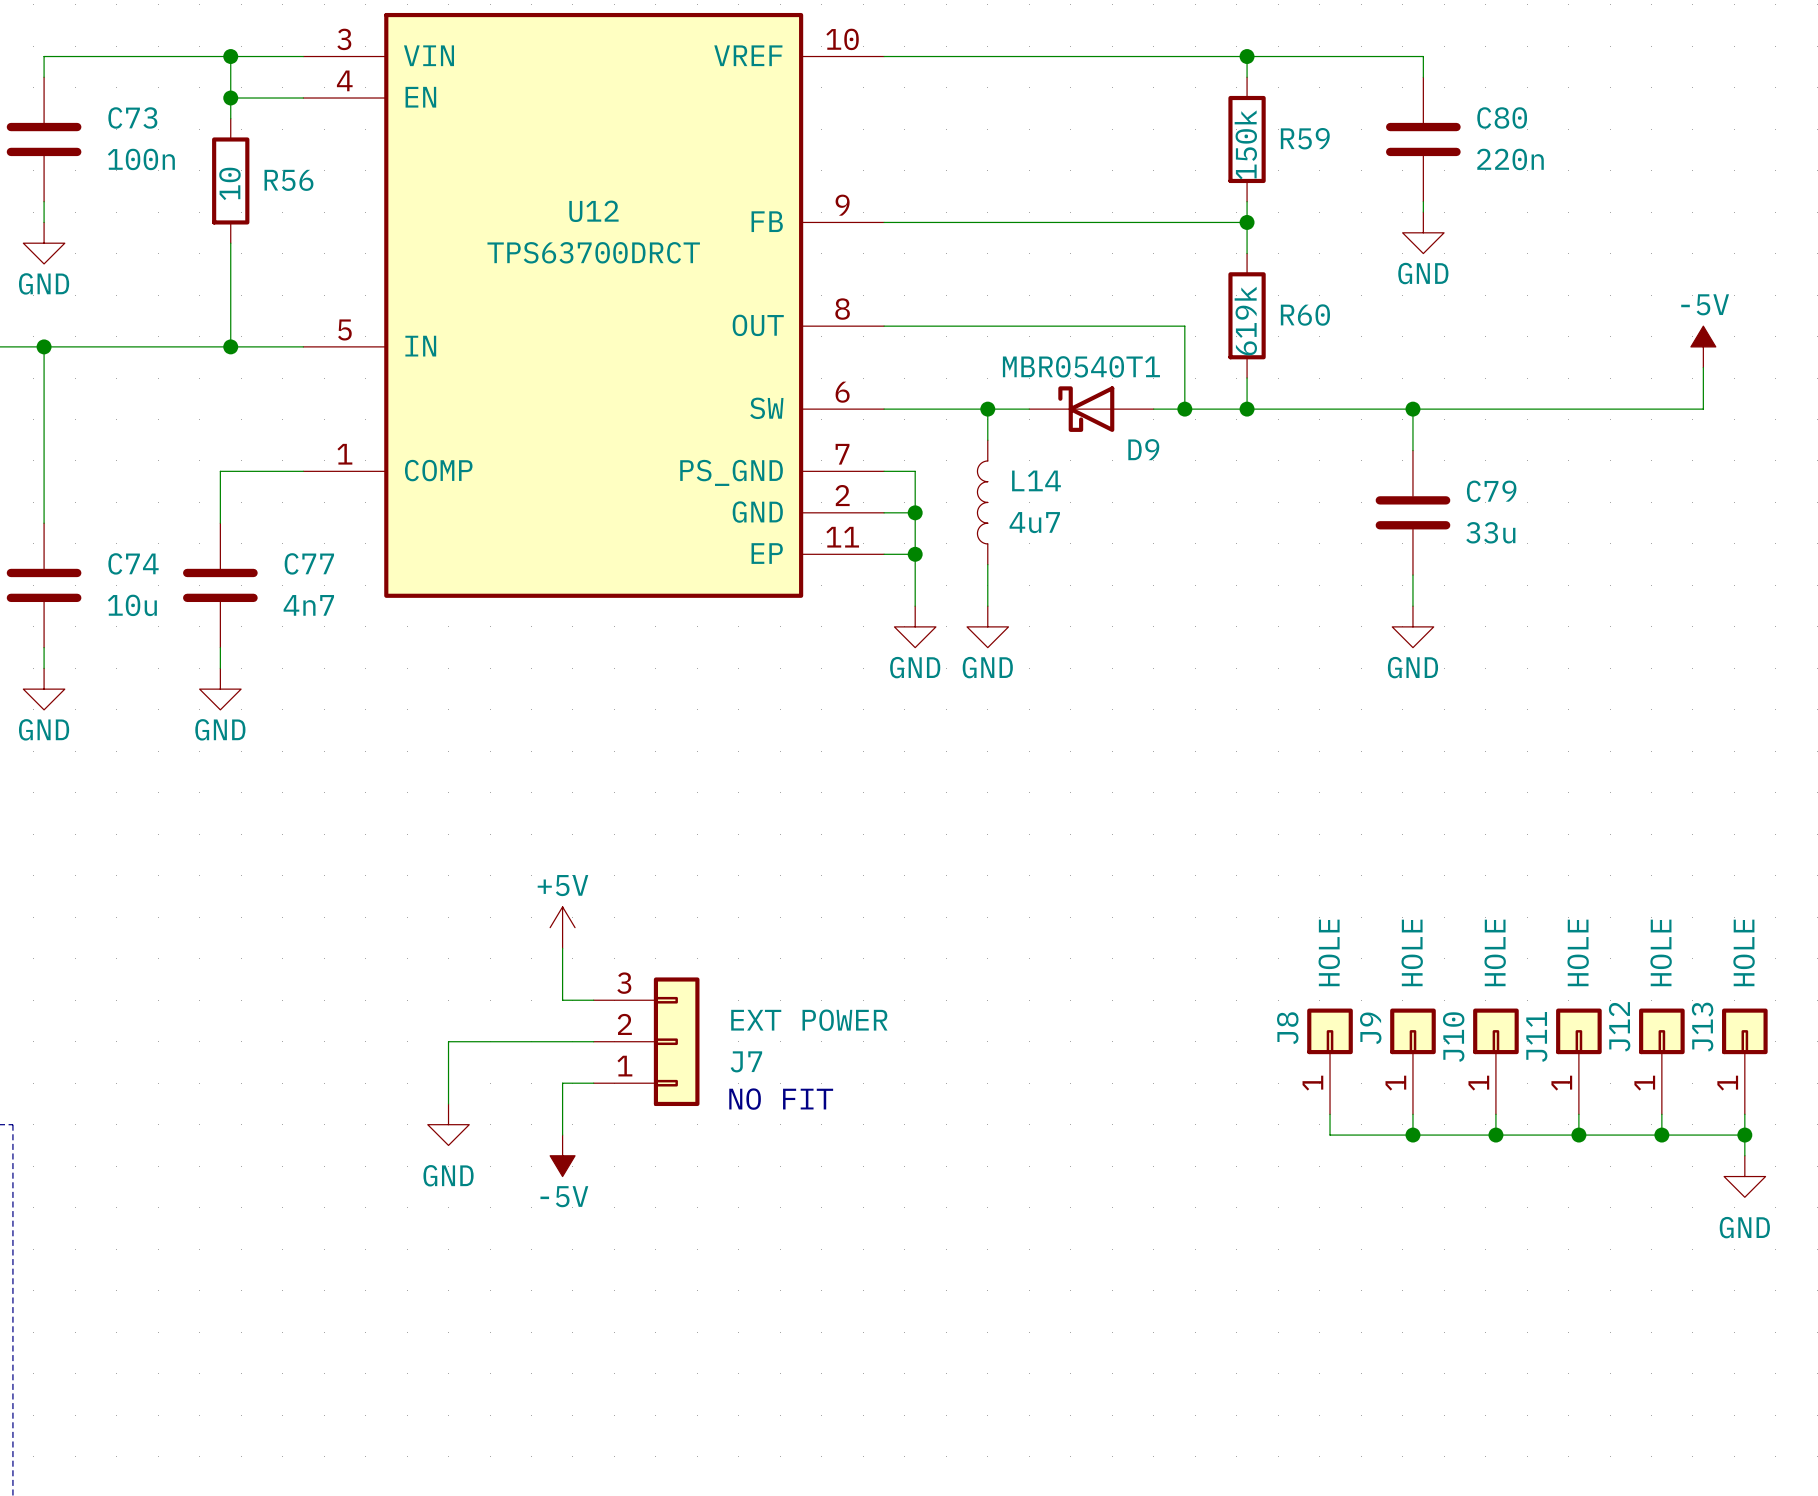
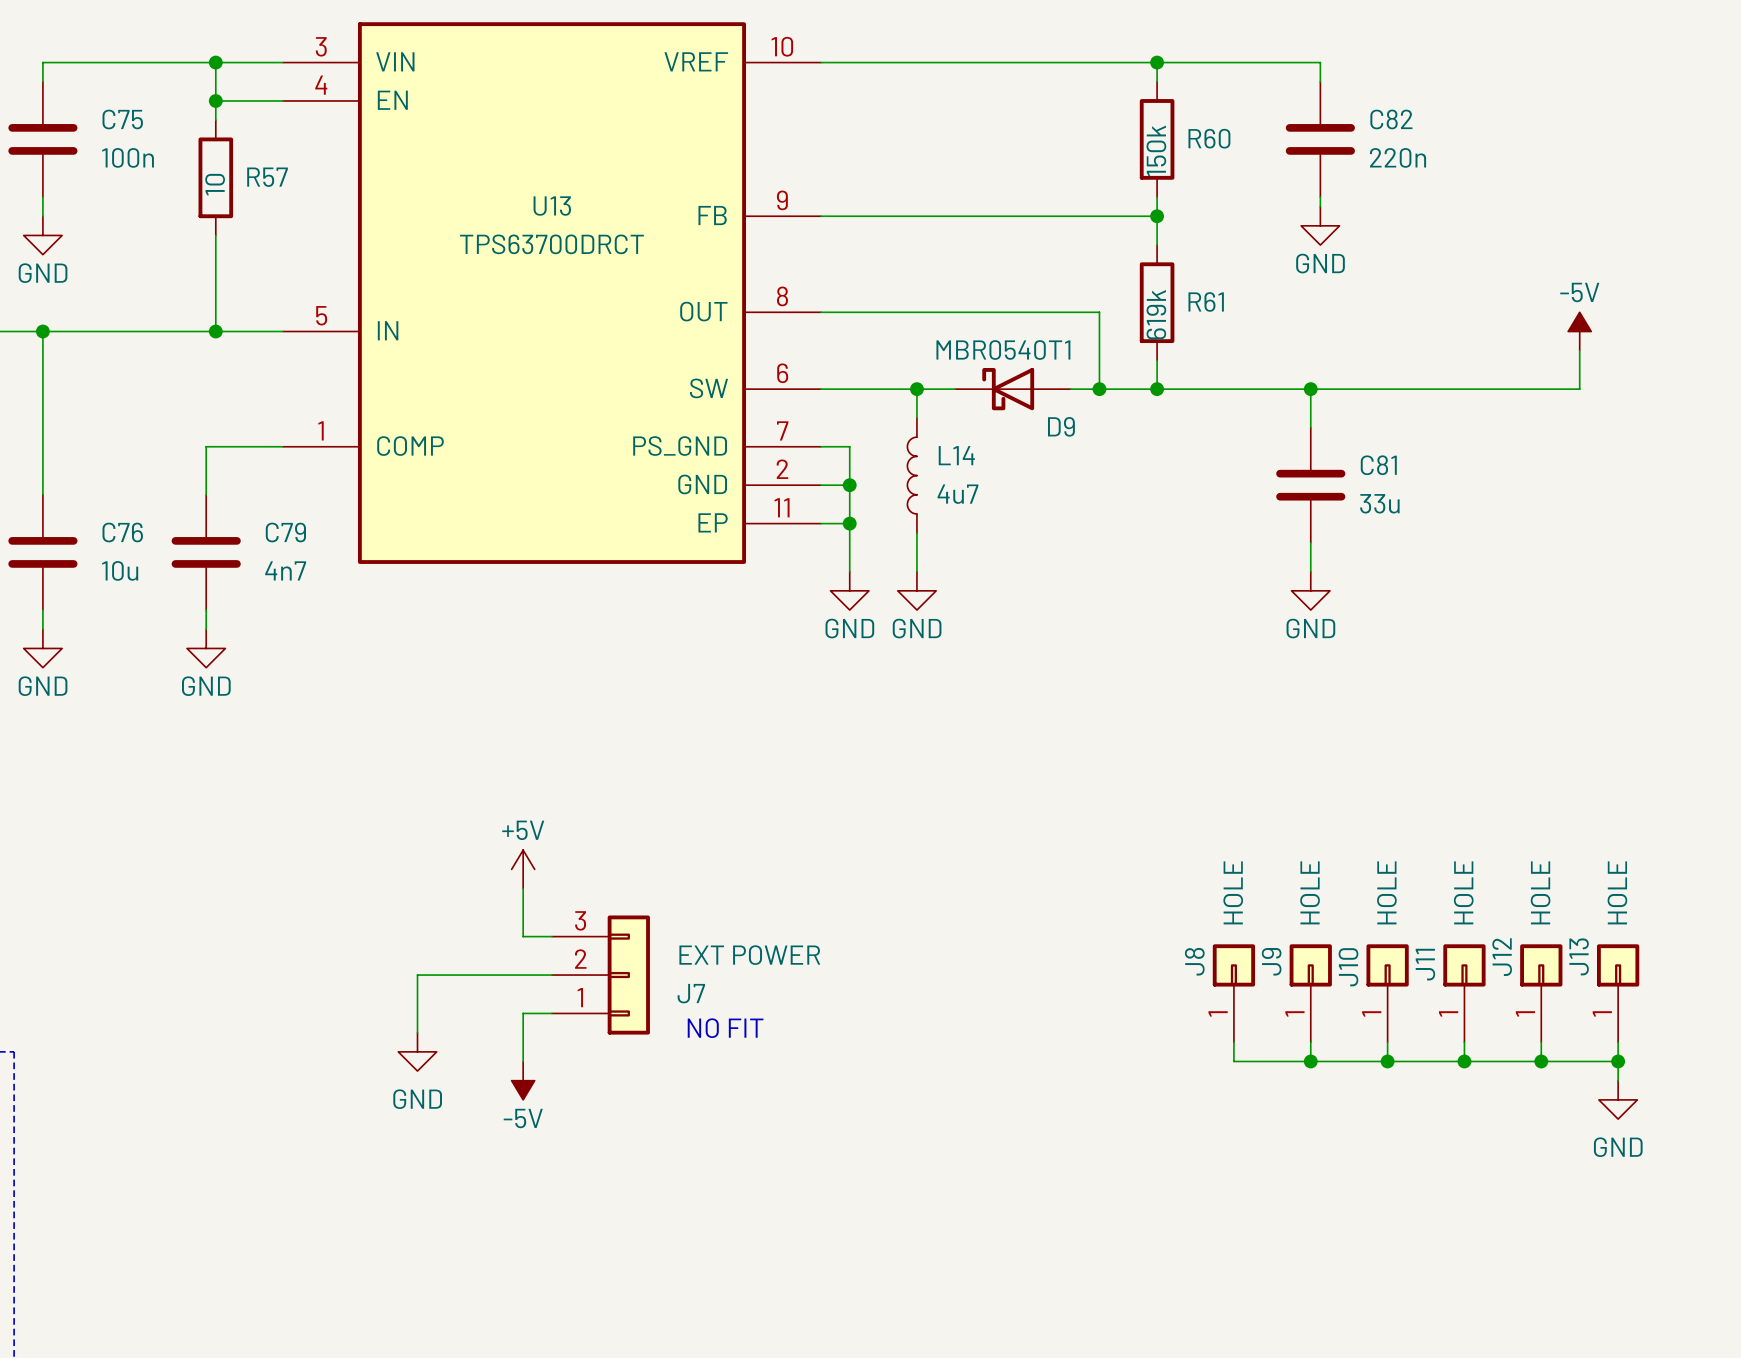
C73 name: C73 (132, 117) -> C75 (122, 119)
C80 name: C80 (1502, 117) -> C82 (1391, 119)
R59 name: R59 (1305, 138) -> R60 (1209, 138)
R56 name: R56 (288, 180) -> R57 (267, 177)
U12 name: U12 (593, 211) -> U13 (552, 206)
R60 name: R60 (1305, 315) -> R61 (1206, 301)
C79 name: C79 (1491, 491) -> C81 (1378, 465)
C74 name: C74 (133, 563) -> C76 (122, 532)
C77 name: C77 (309, 563) -> C79 (285, 532)

